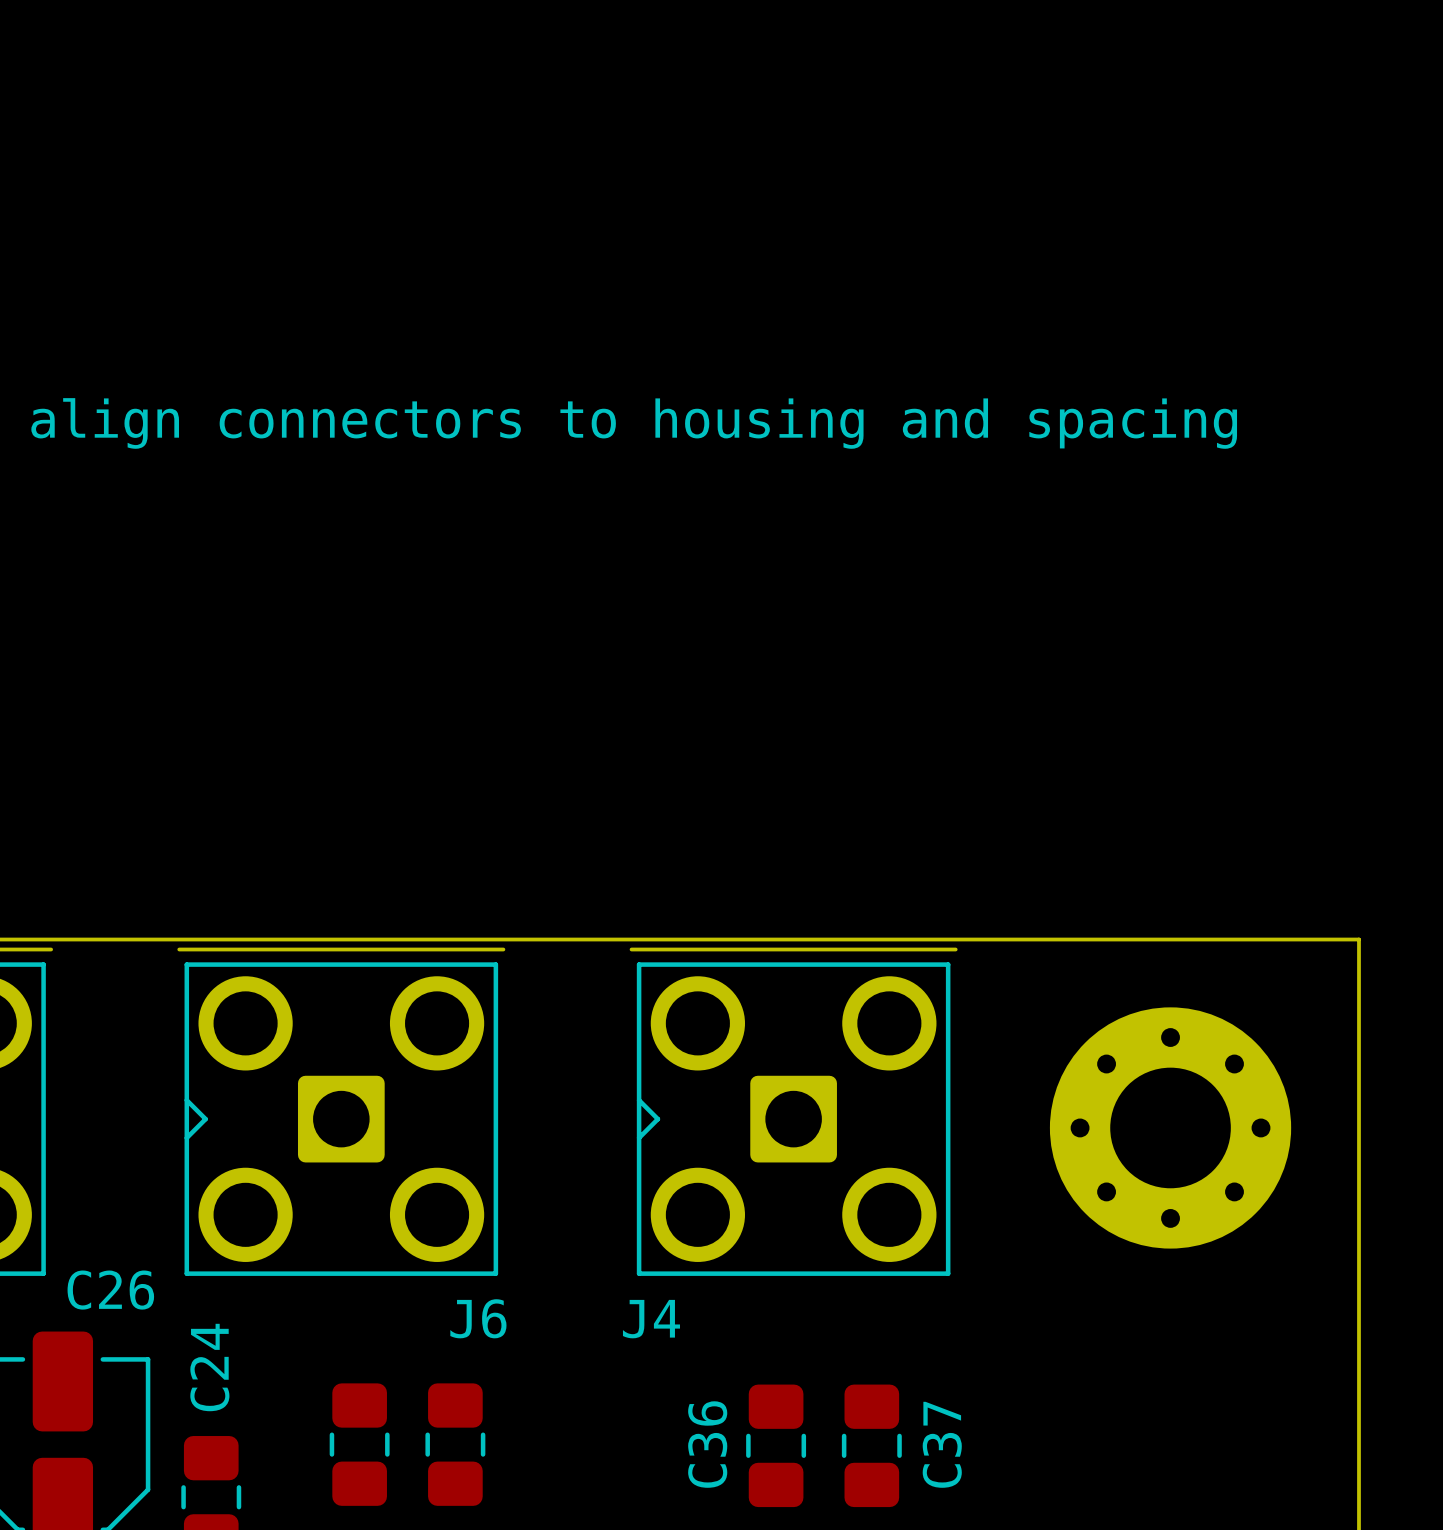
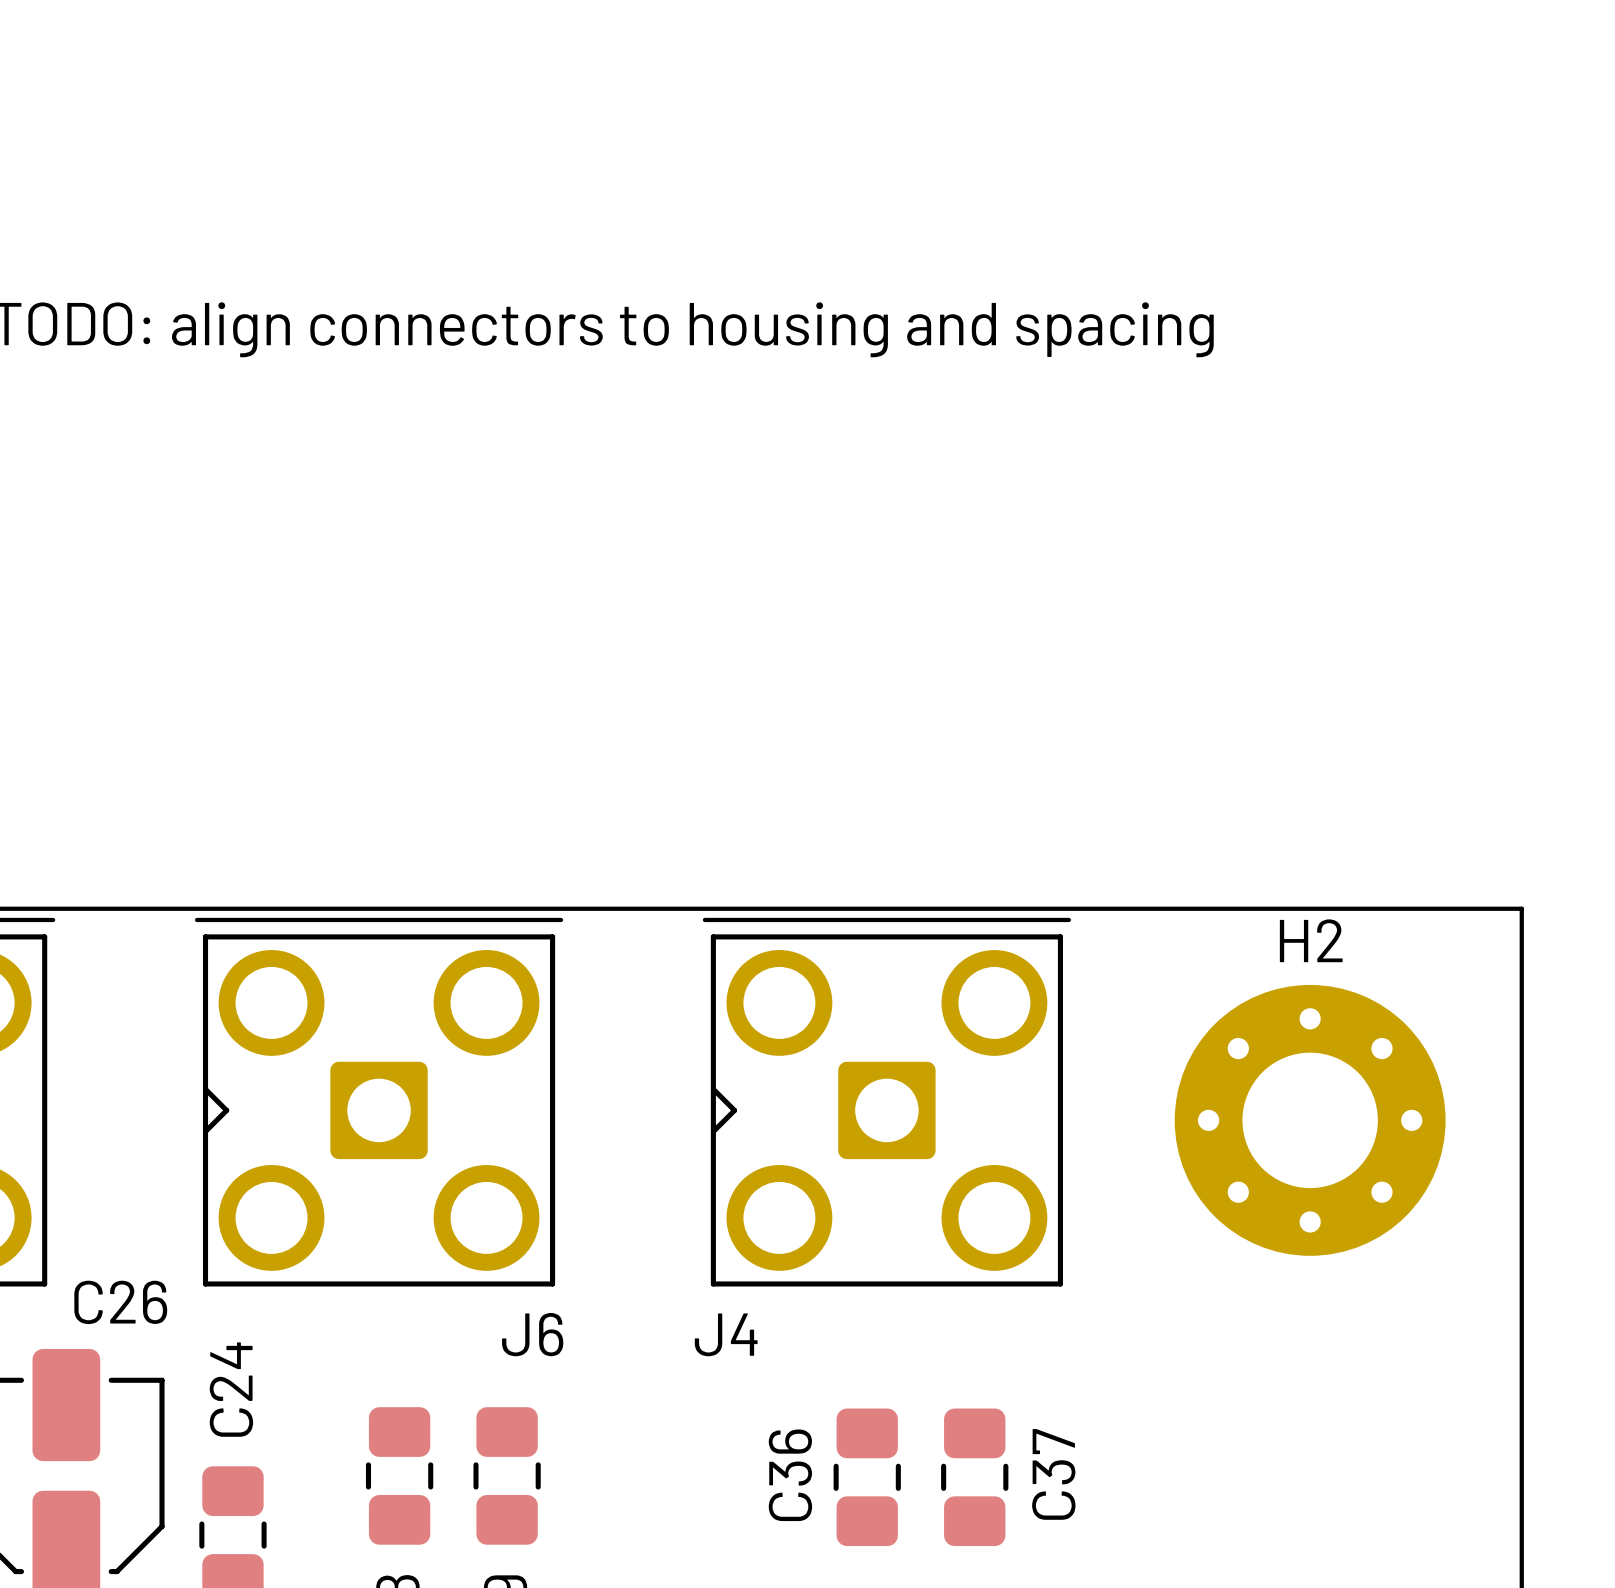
H2 name: none -> H2 (1311, 940)

